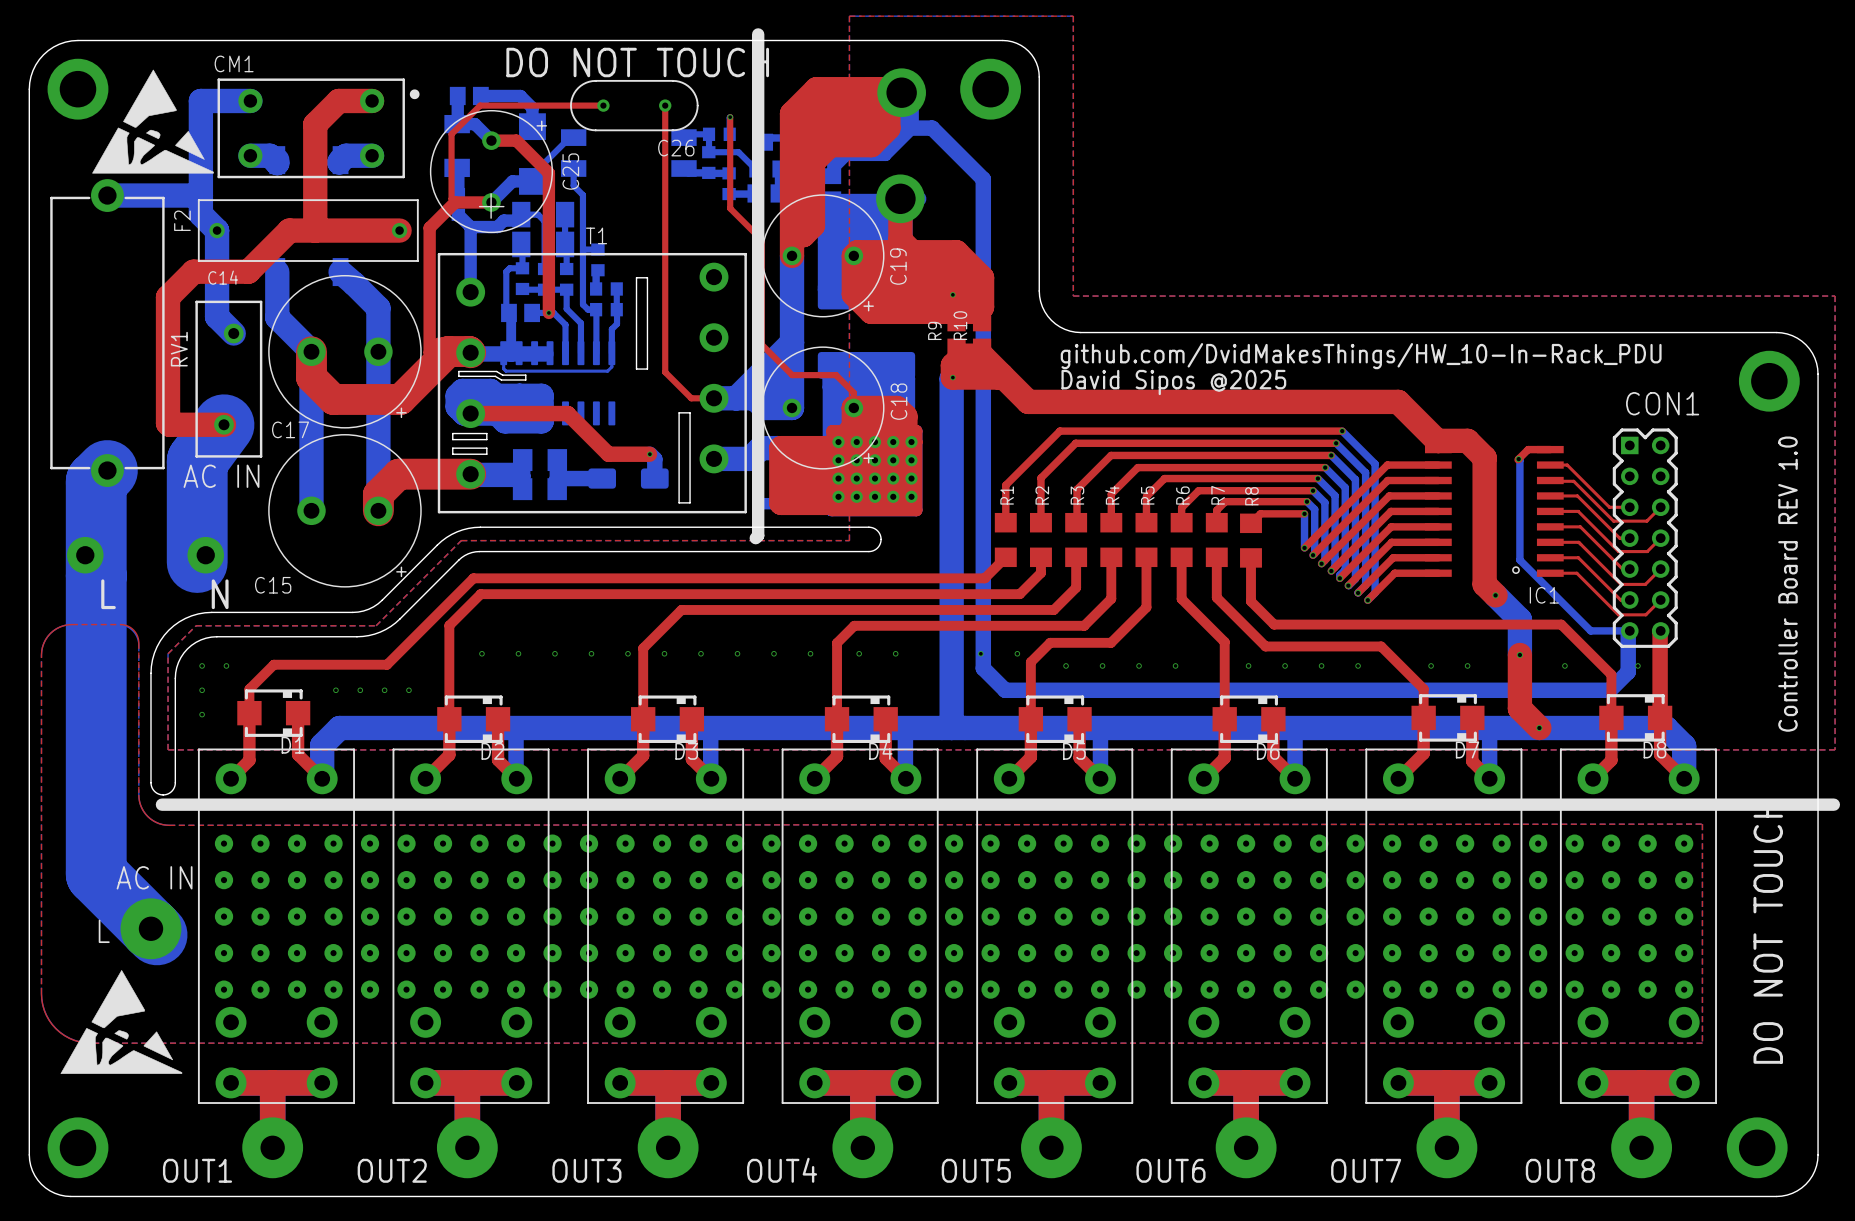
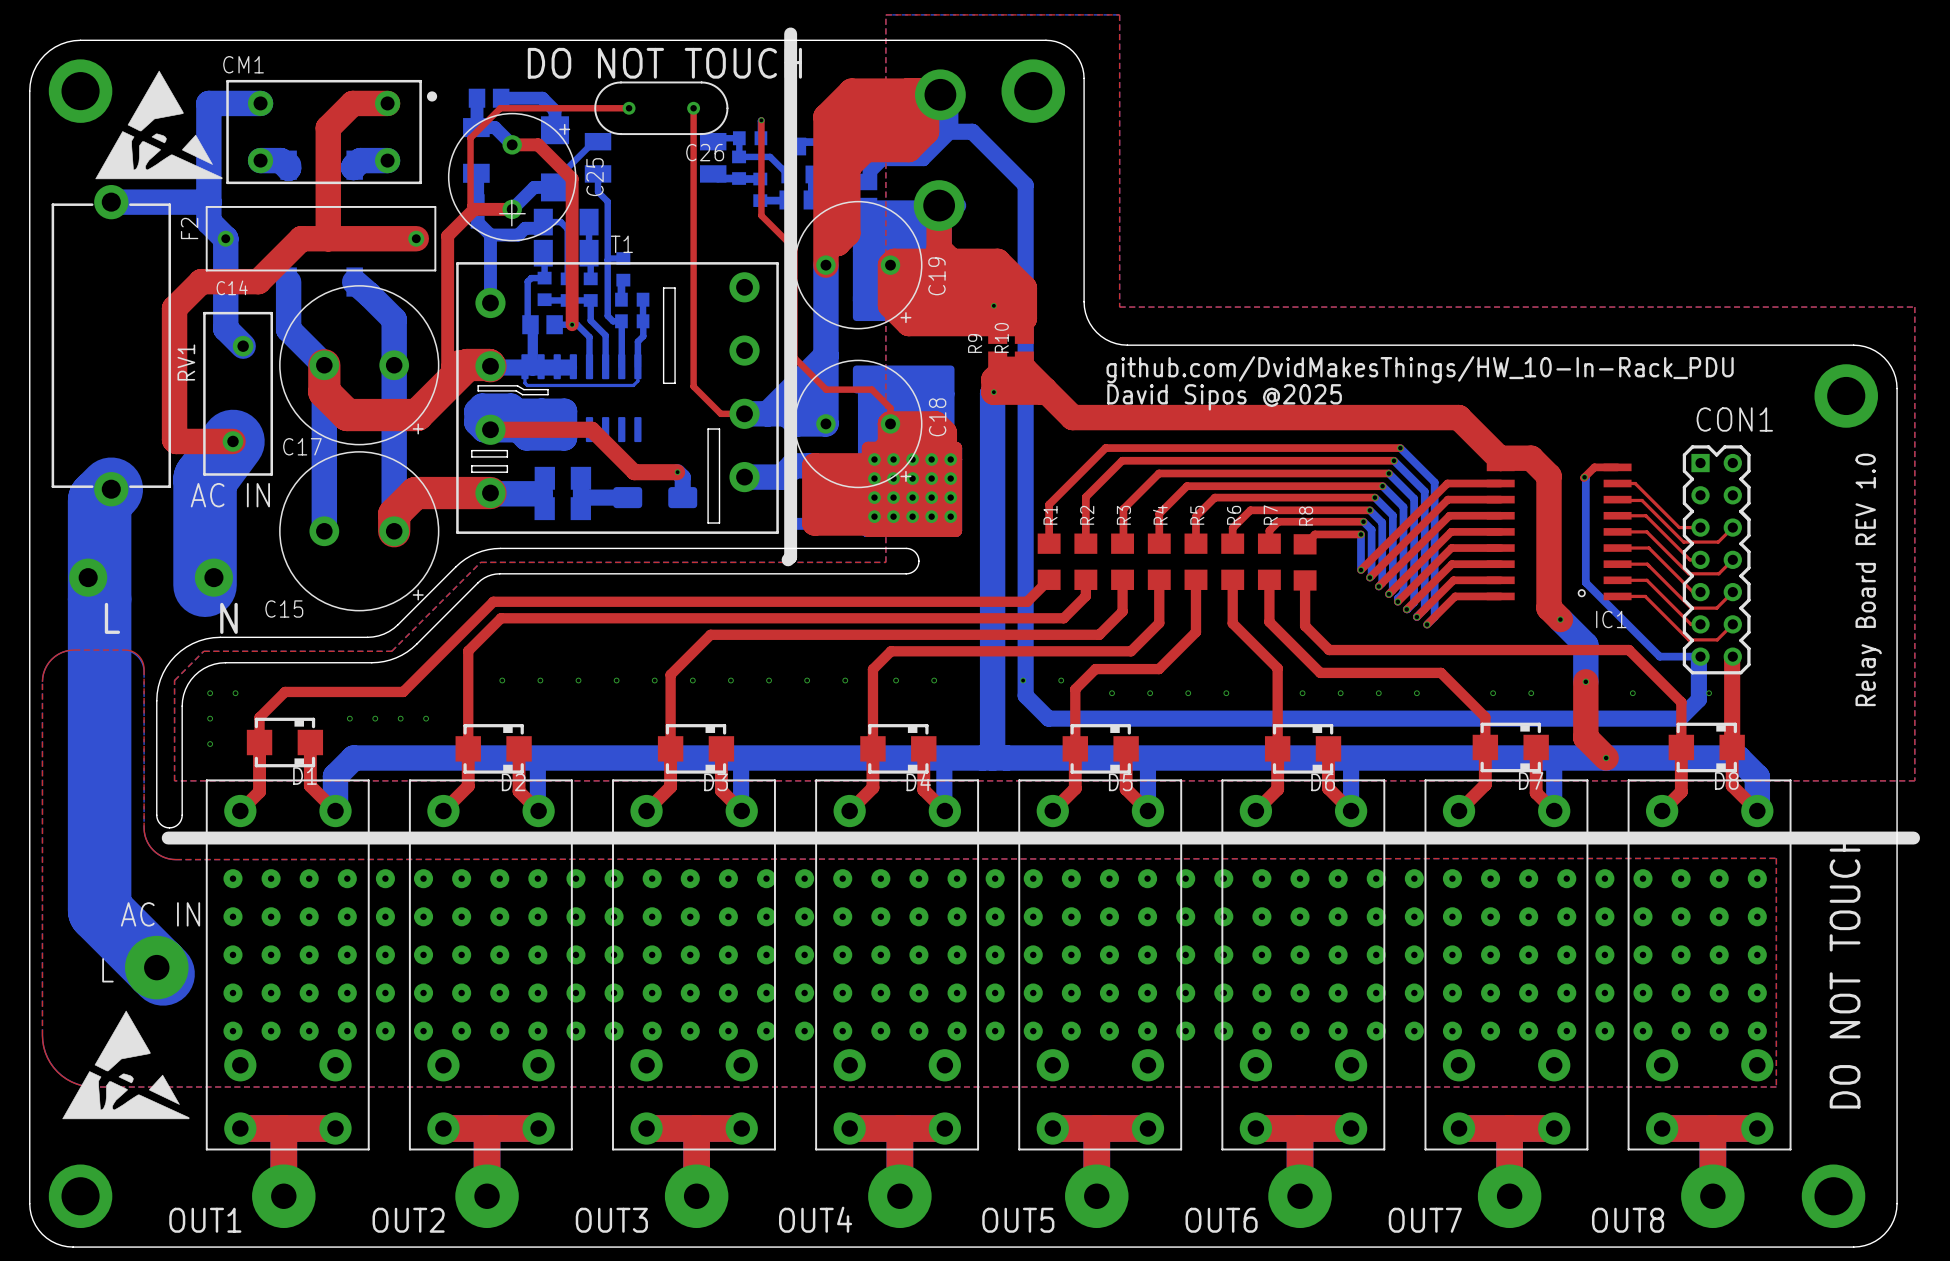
text: Controller Board REV 1.0 (1787, 584) -> Relay Board REV 1.0 (1868, 579)

